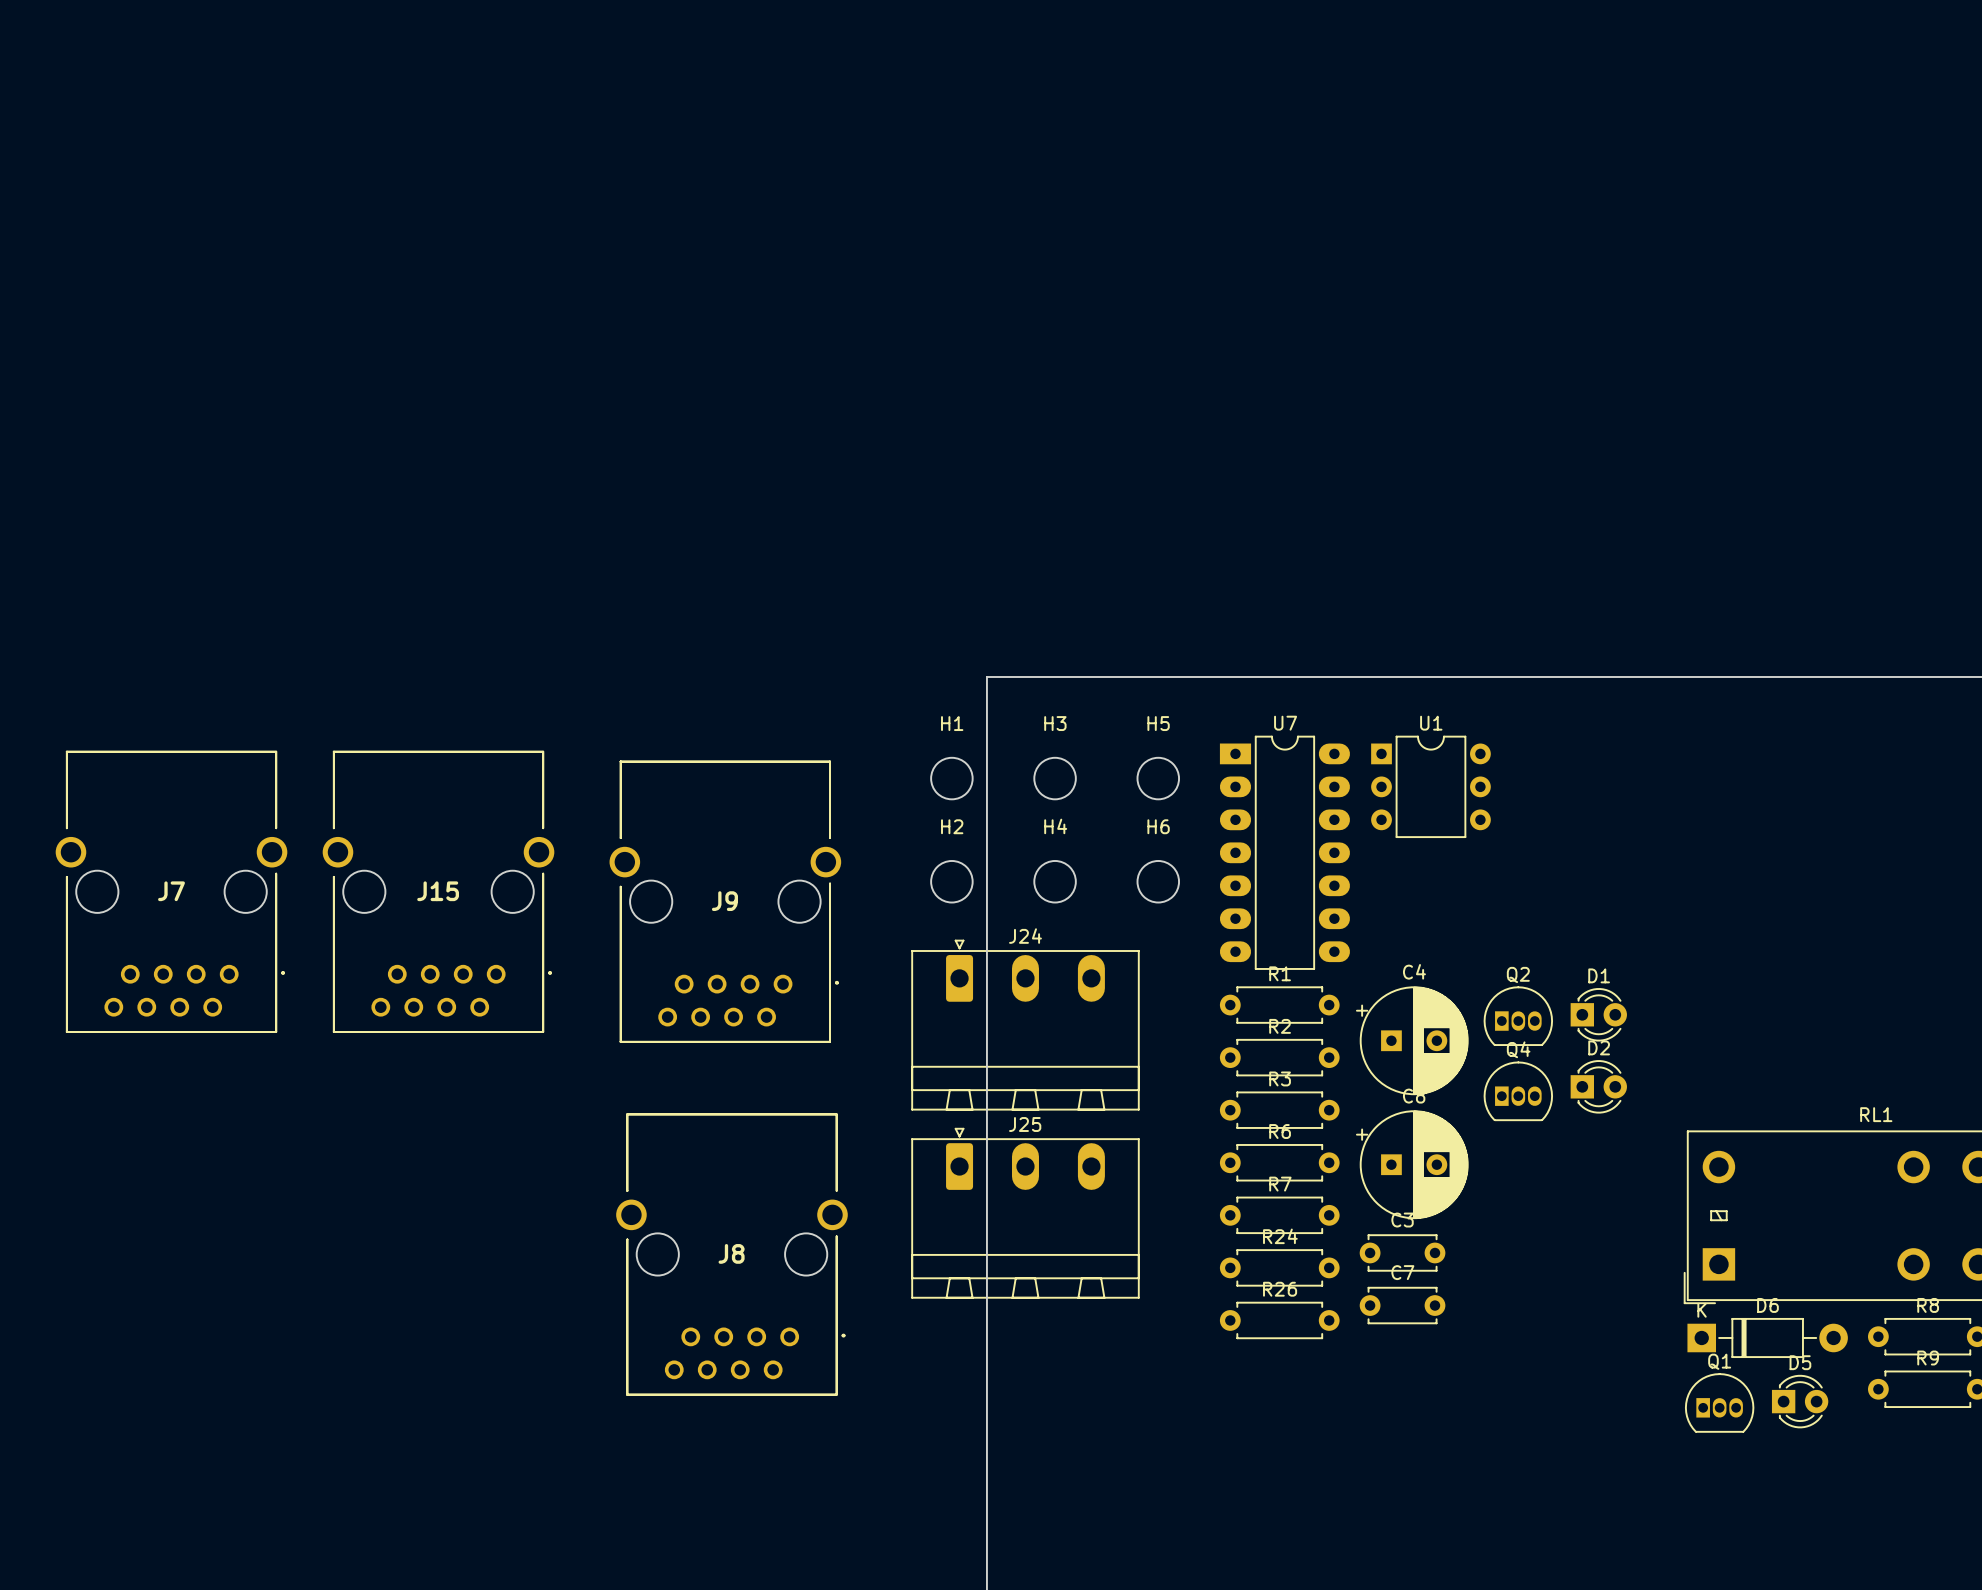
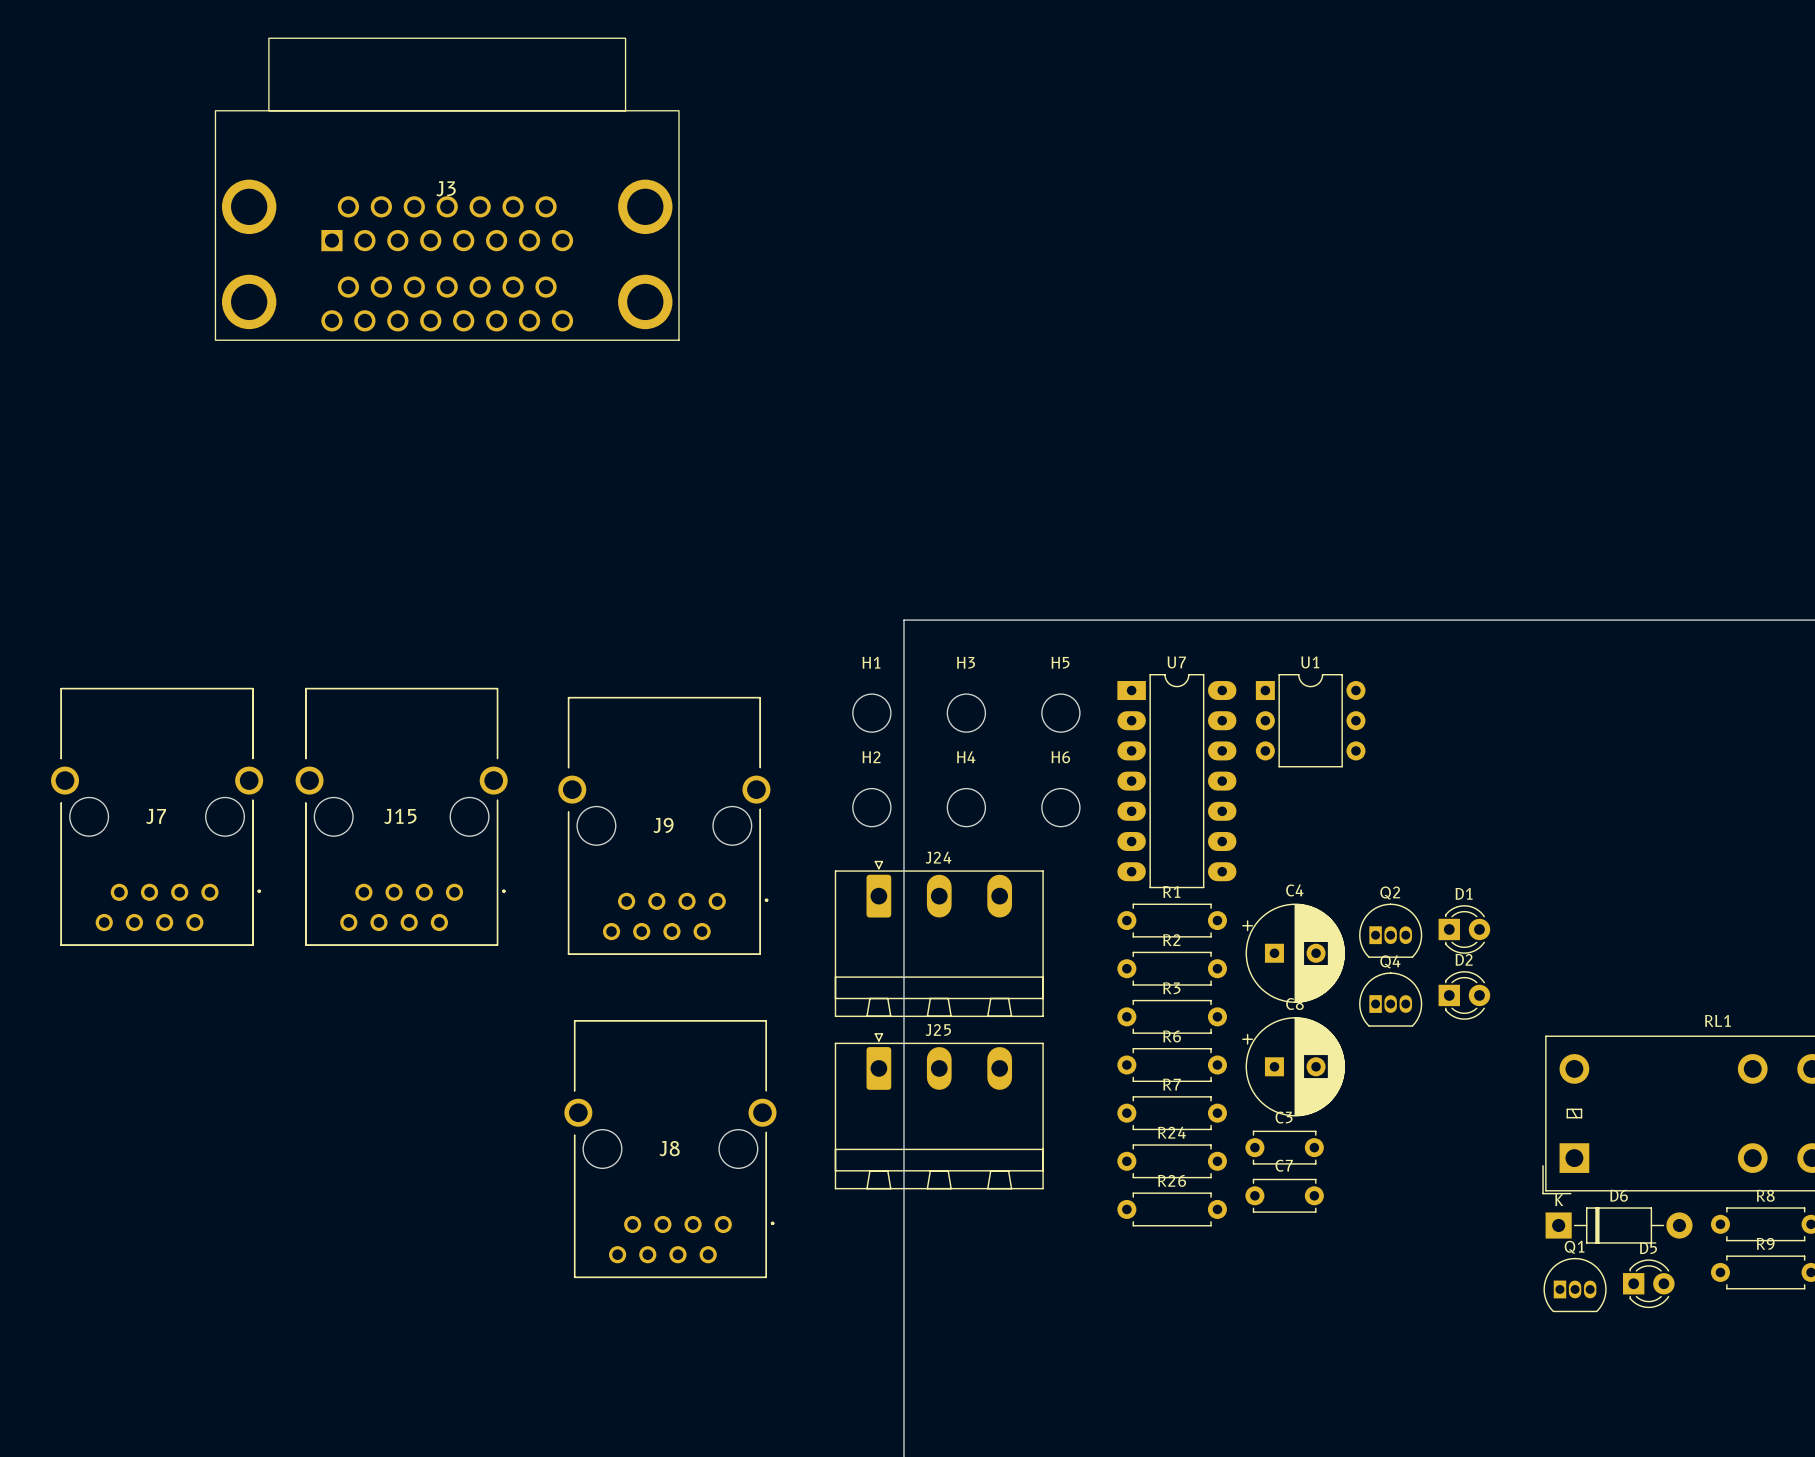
J3: none -> (447, 189)

